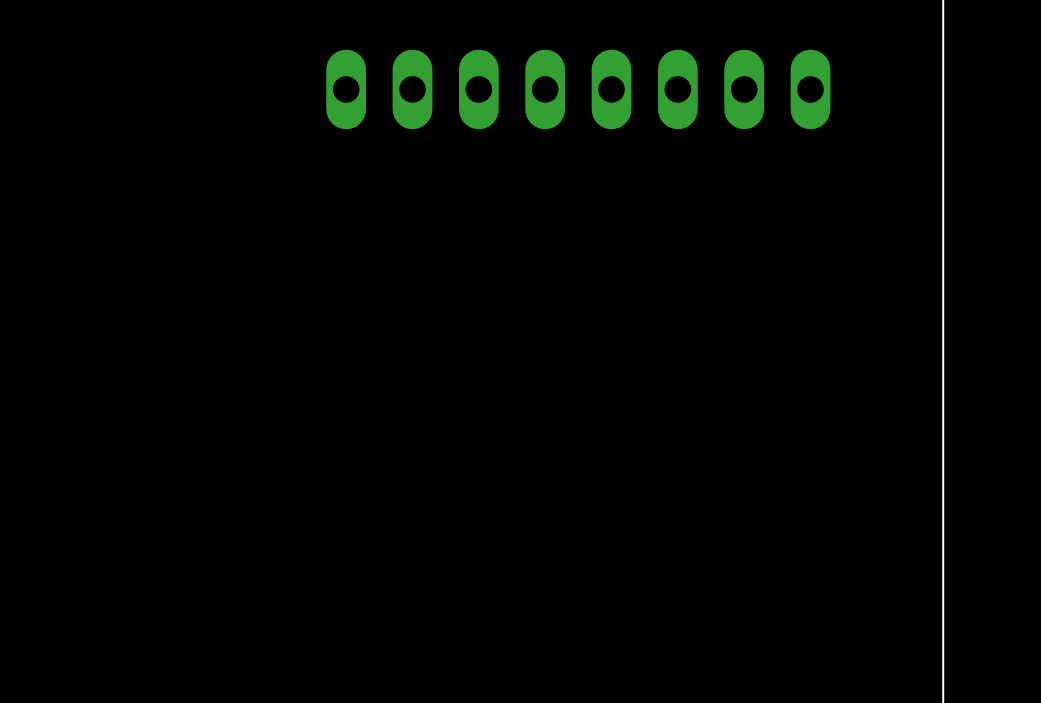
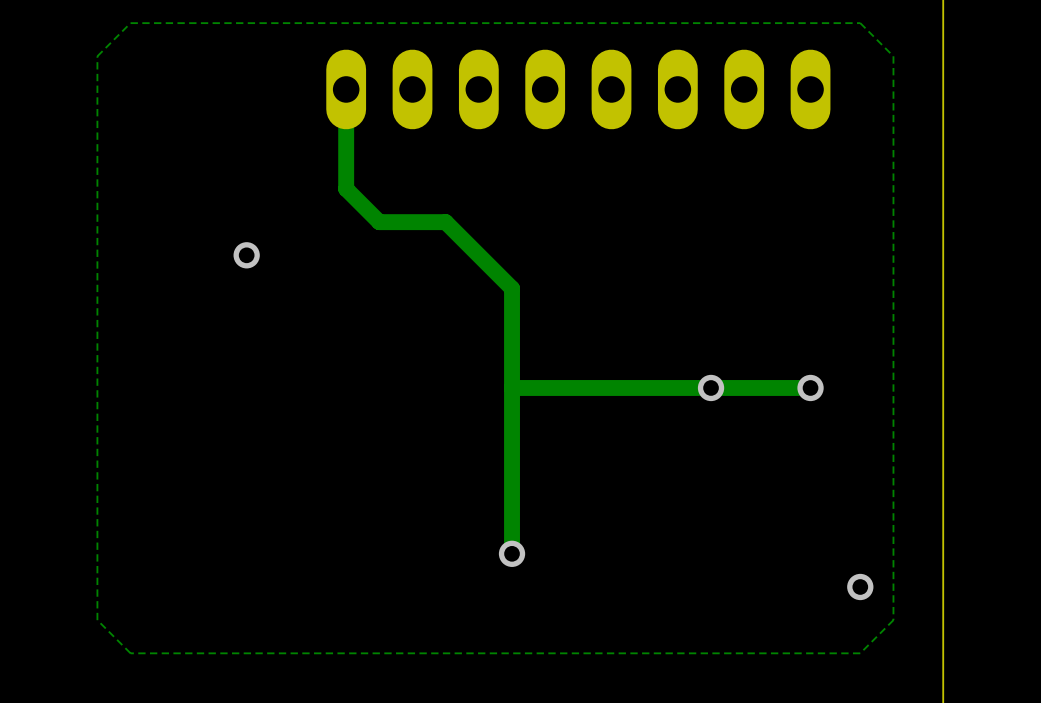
zone outline: none -> (860, 23) (130, 23) (97, 56) (97, 620) (130, 653) (860, 653) (893, 620) (893, 56) (860, 23)
track: none -> (346, 89) (346, 188) (379, 222) (445, 222) (512, 288) (512, 553)
via: none -> (246, 255)
via: none -> (711, 387)
track: none -> (810, 387) (512, 387)
via: none -> (810, 387)
via: none -> (512, 553)
via: none -> (860, 586)

